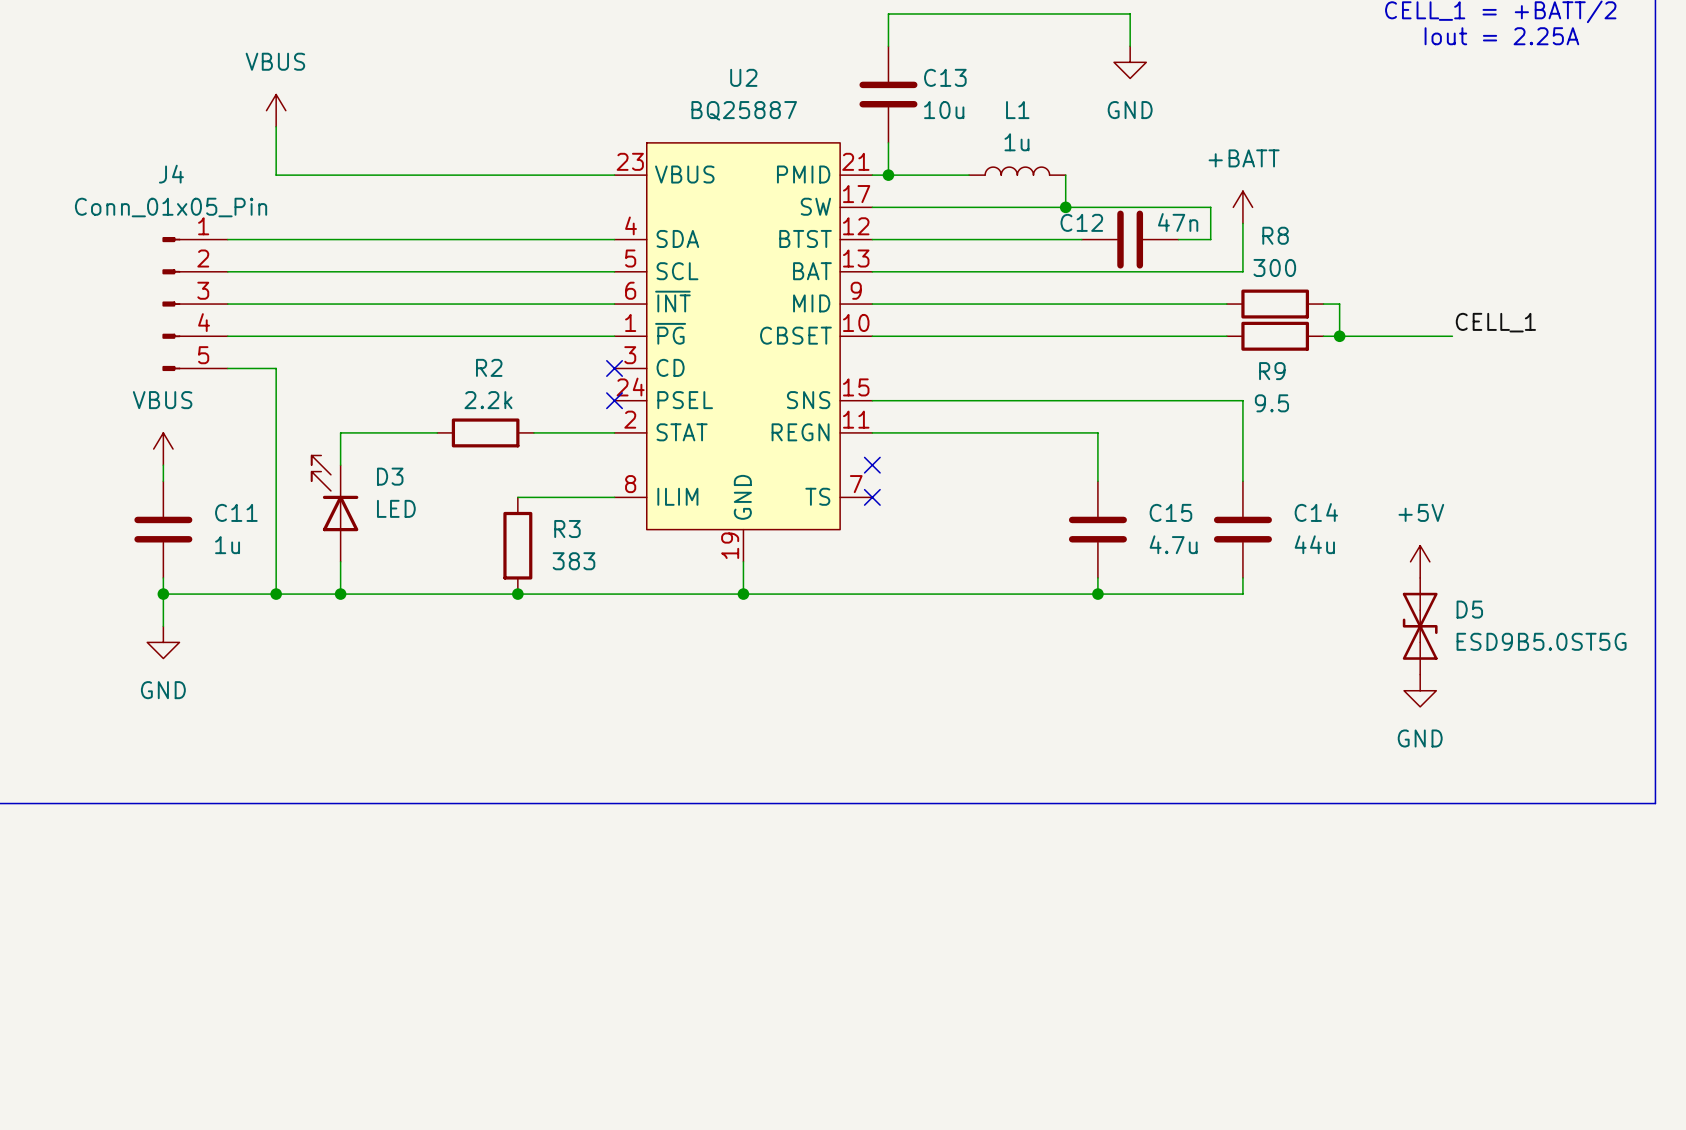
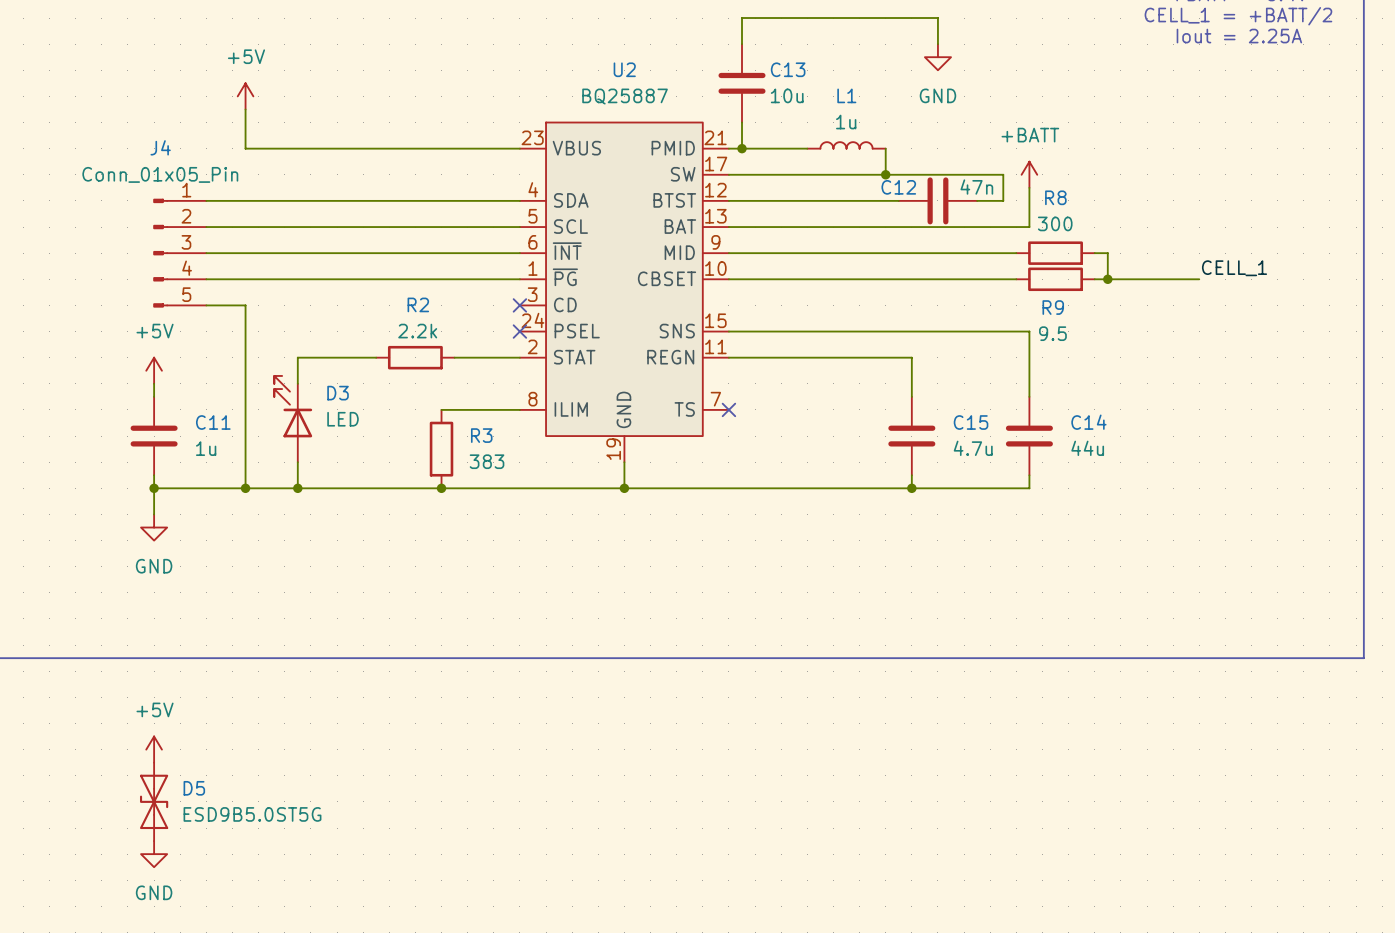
power symbol: VBUS (276, 110) -> +5V (245, 96)
power symbol: VBUS (163, 449) -> +5V (154, 370)
no-connect mark: (872, 465) -> none
power symbol: +5V (1420, 561) -> none
D5 position: (1420, 626) -> (154, 801)
power symbol: GND (1420, 690) -> none
power symbol: none -> +5V (154, 749)
power symbol: none -> GND (154, 854)

